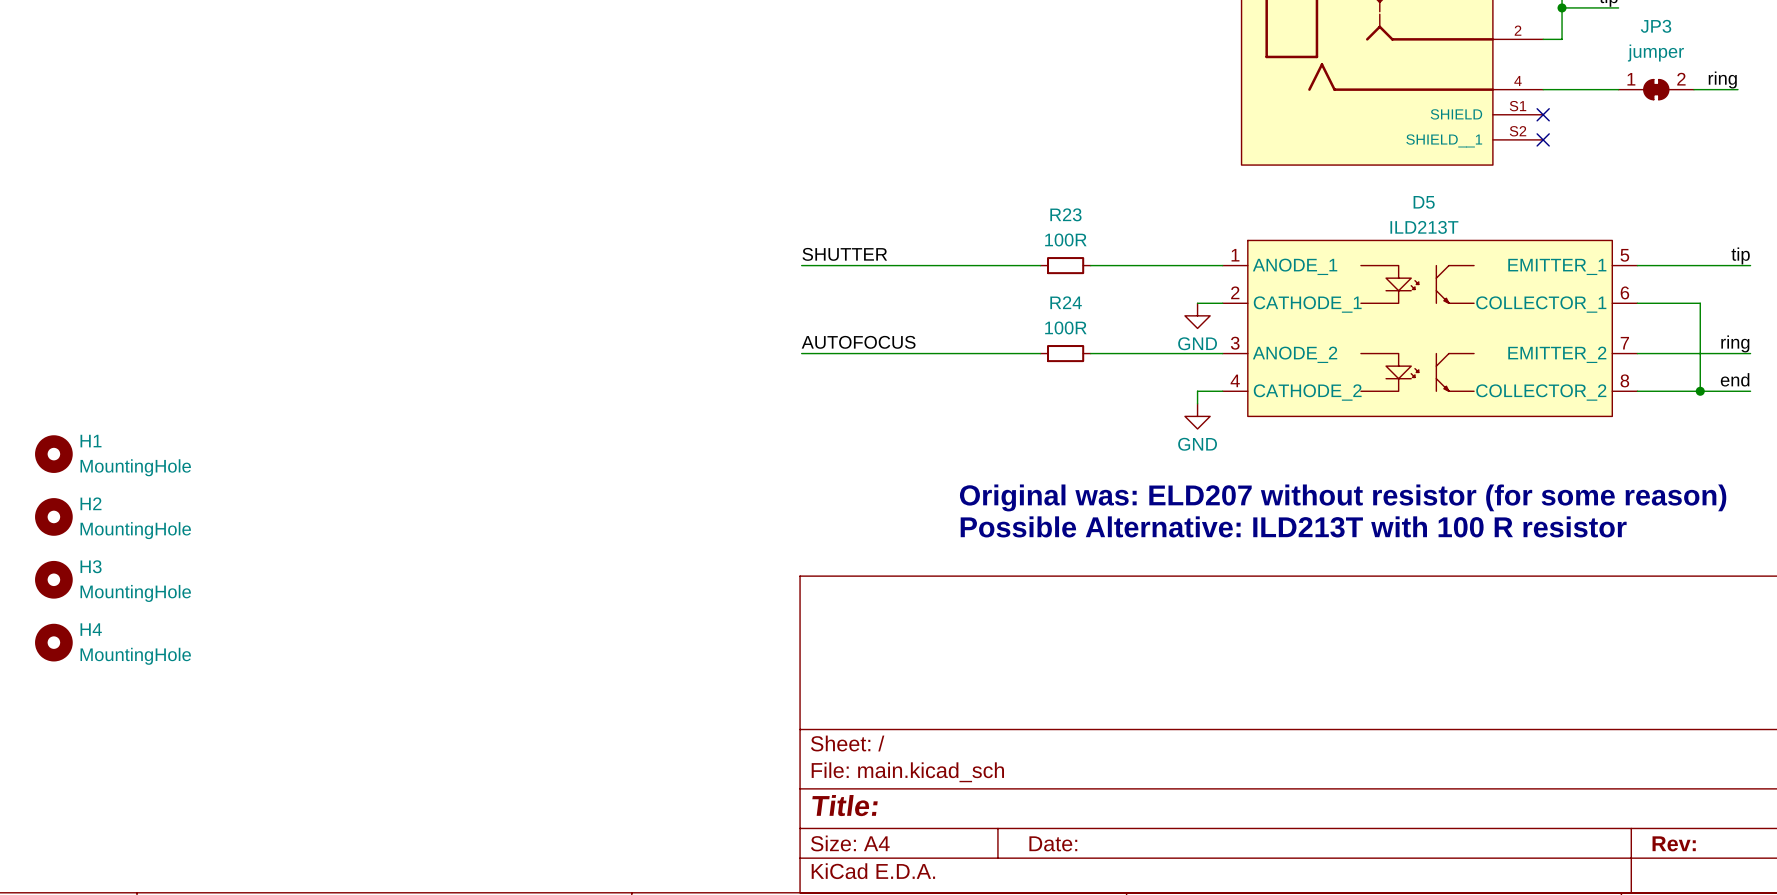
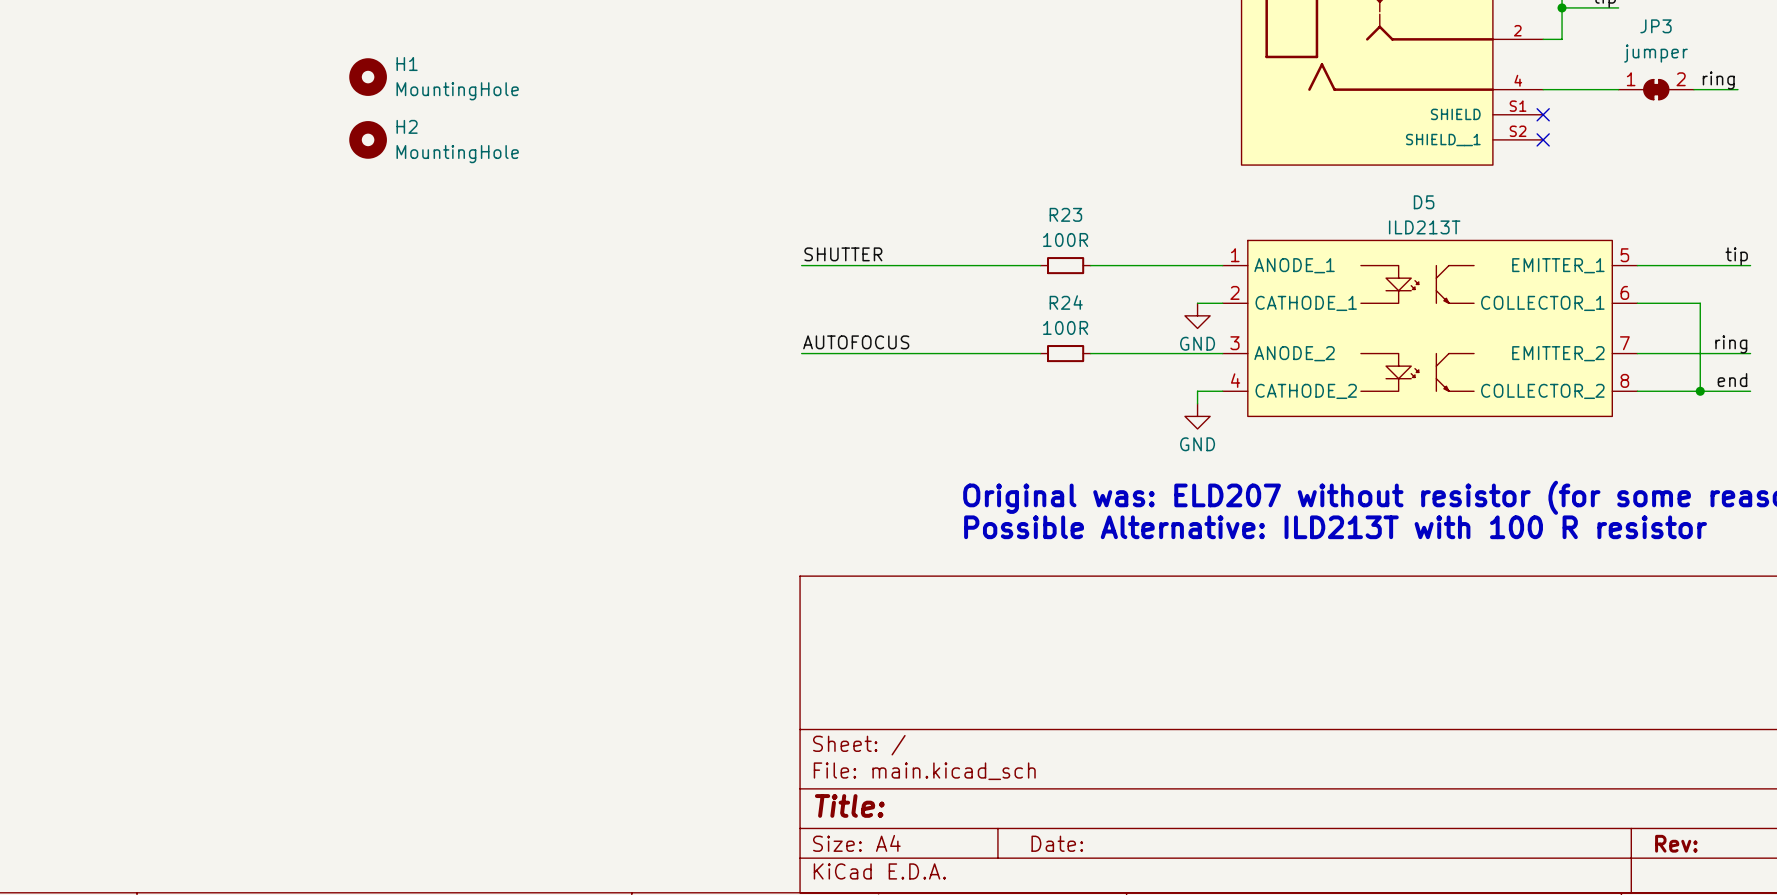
H1 position: (53, 454) -> (368, 77)
H2 position: (53, 516) -> (368, 139)
H3: MountingHole (53, 579) -> none
H4: MountingHole (53, 642) -> none

